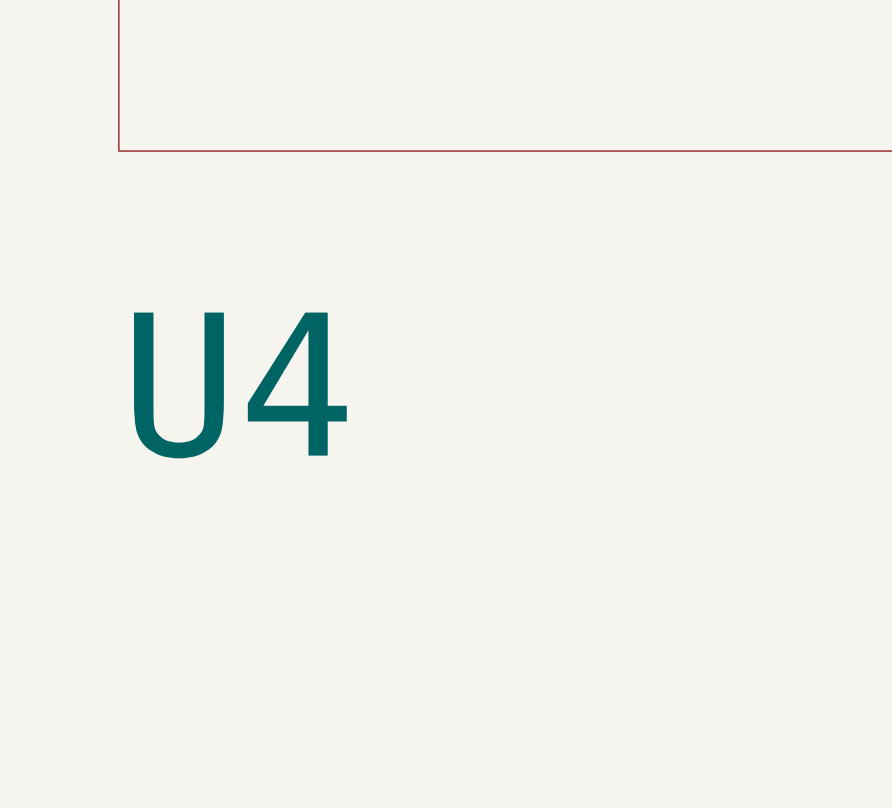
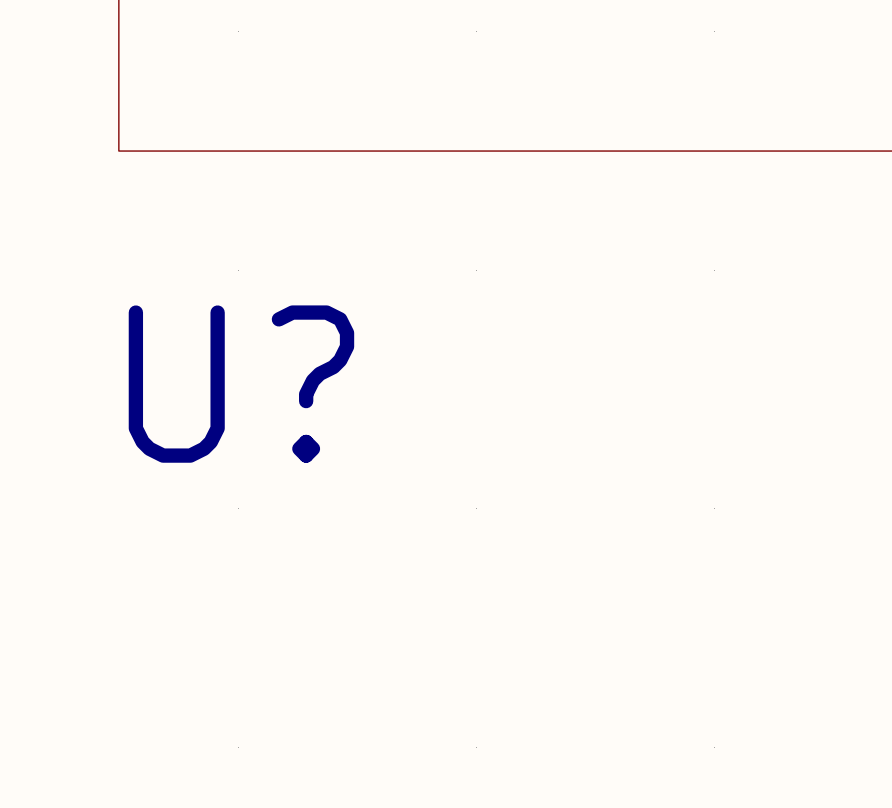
U4 name: U4 (240, 385) -> U? (241, 384)

